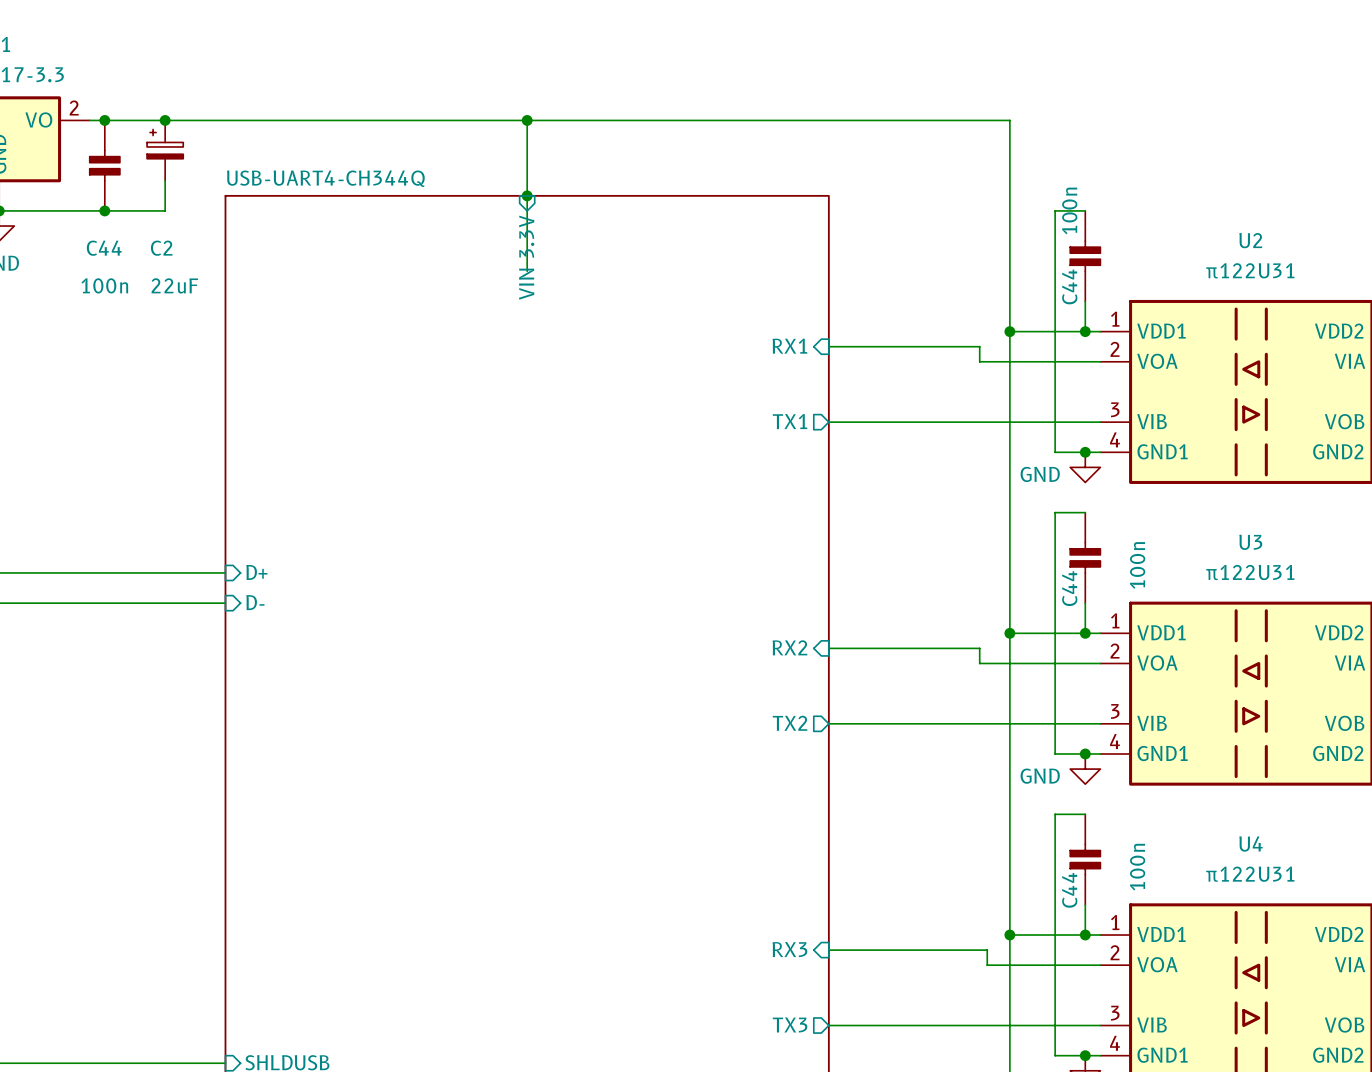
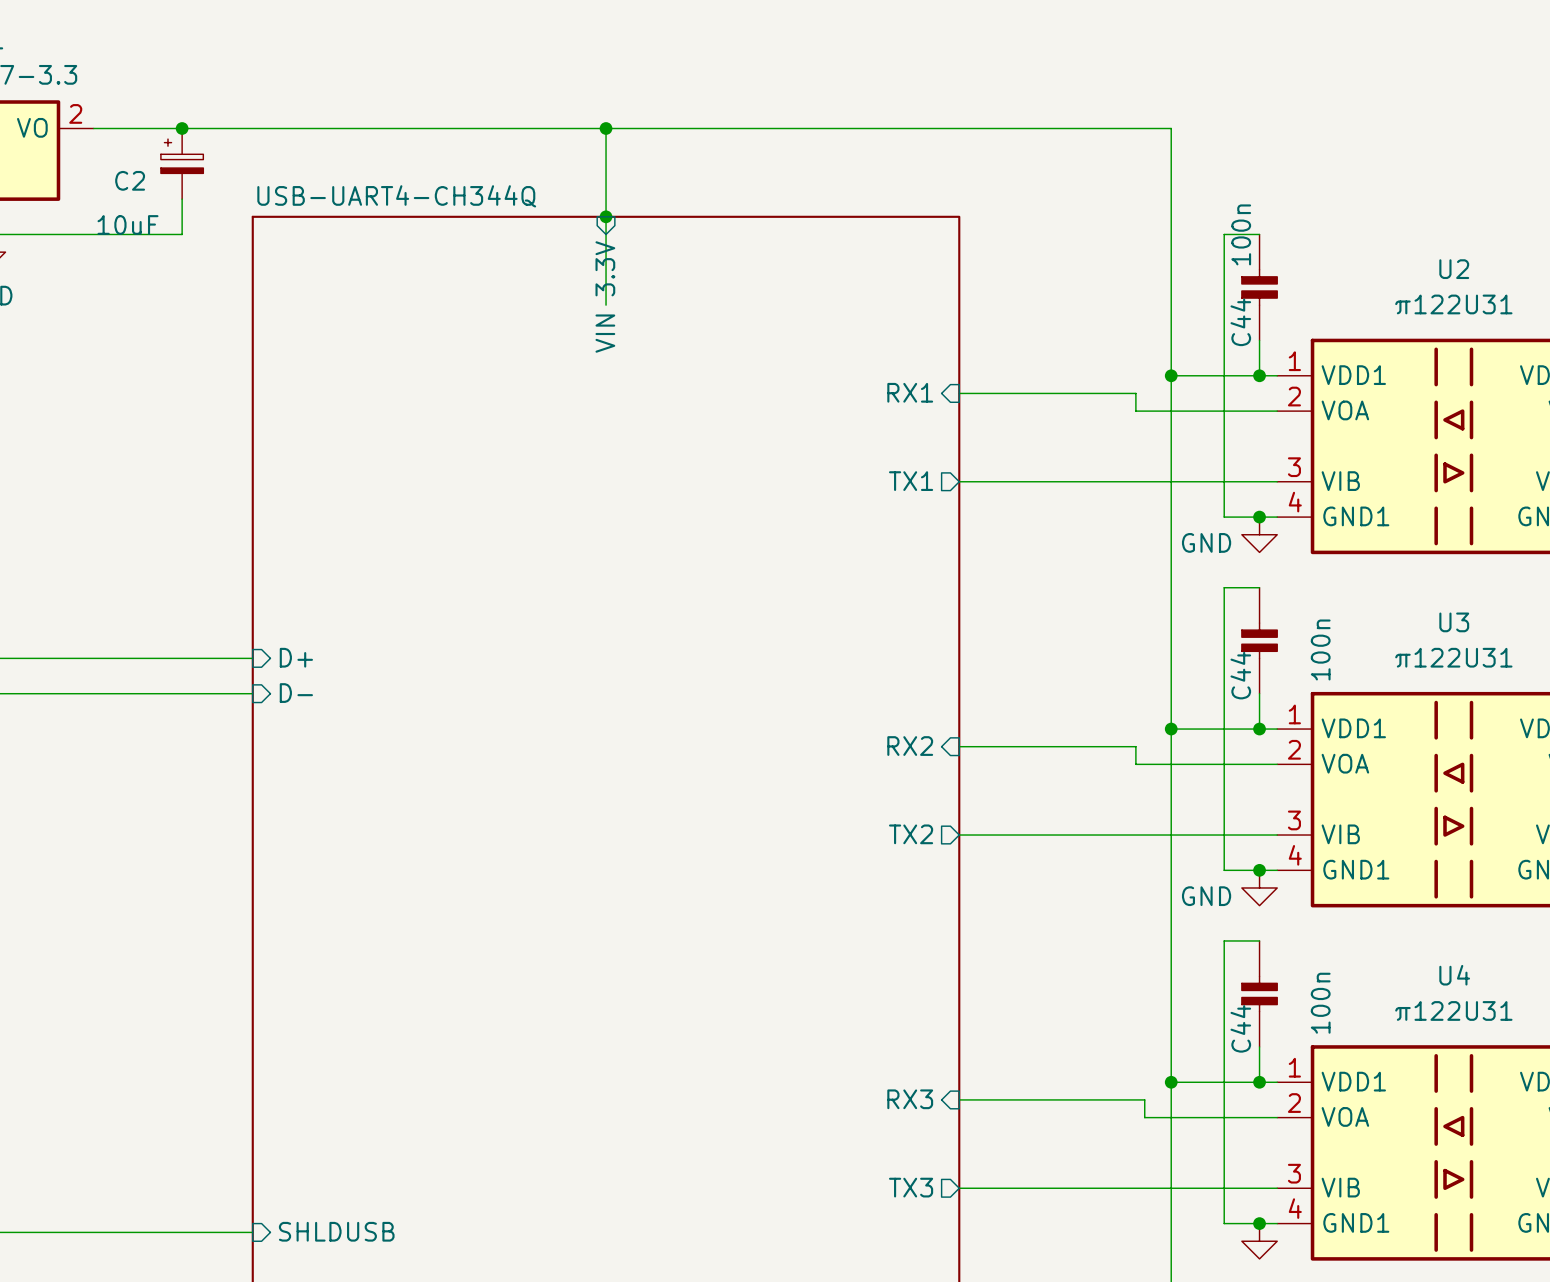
junction: (104, 120) -> none
C44: 100n (104, 165) -> none
junction: (104, 210) -> none
C2 name position: C2 (161, 248) -> C2 (130, 180)
C2 value: 22uF (174, 285) -> 10uF (128, 224)

